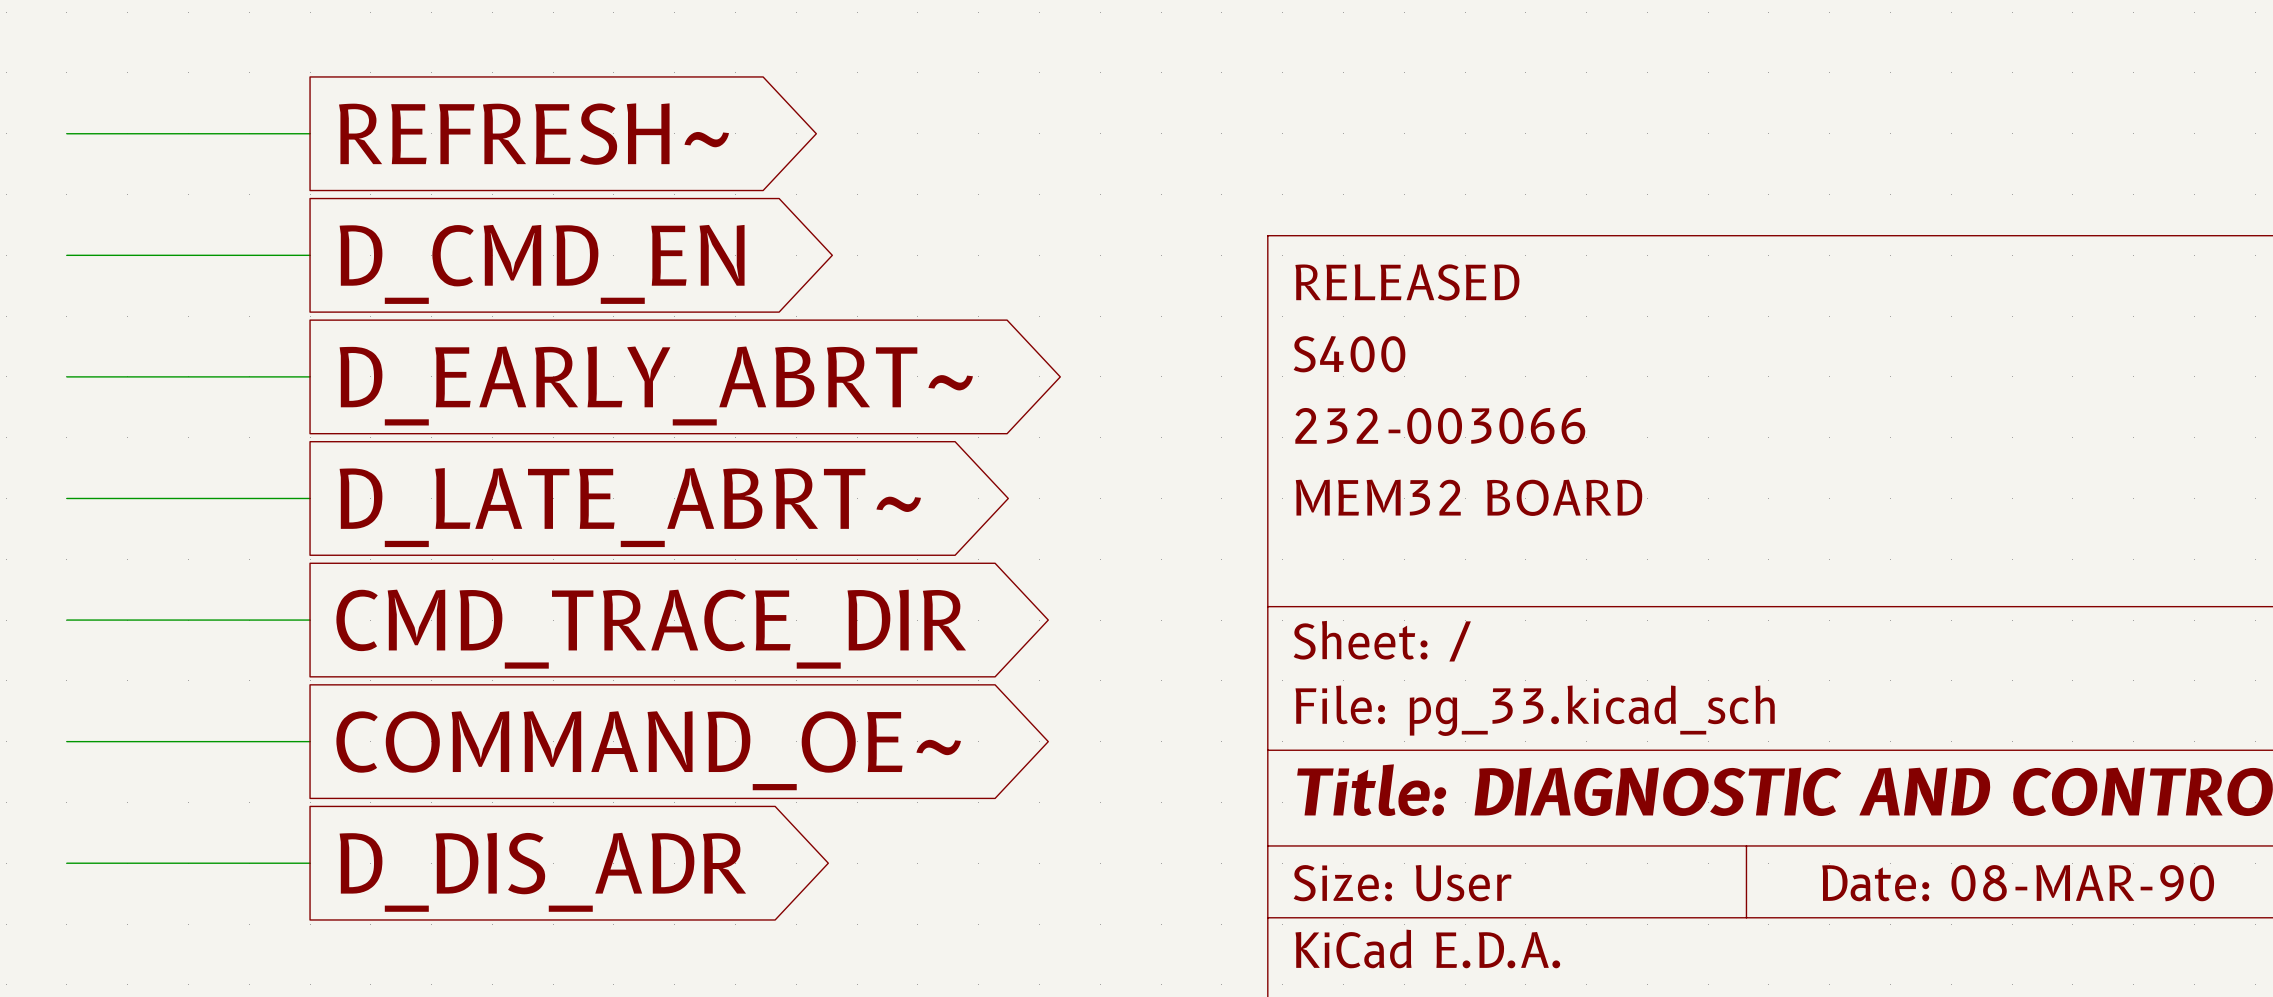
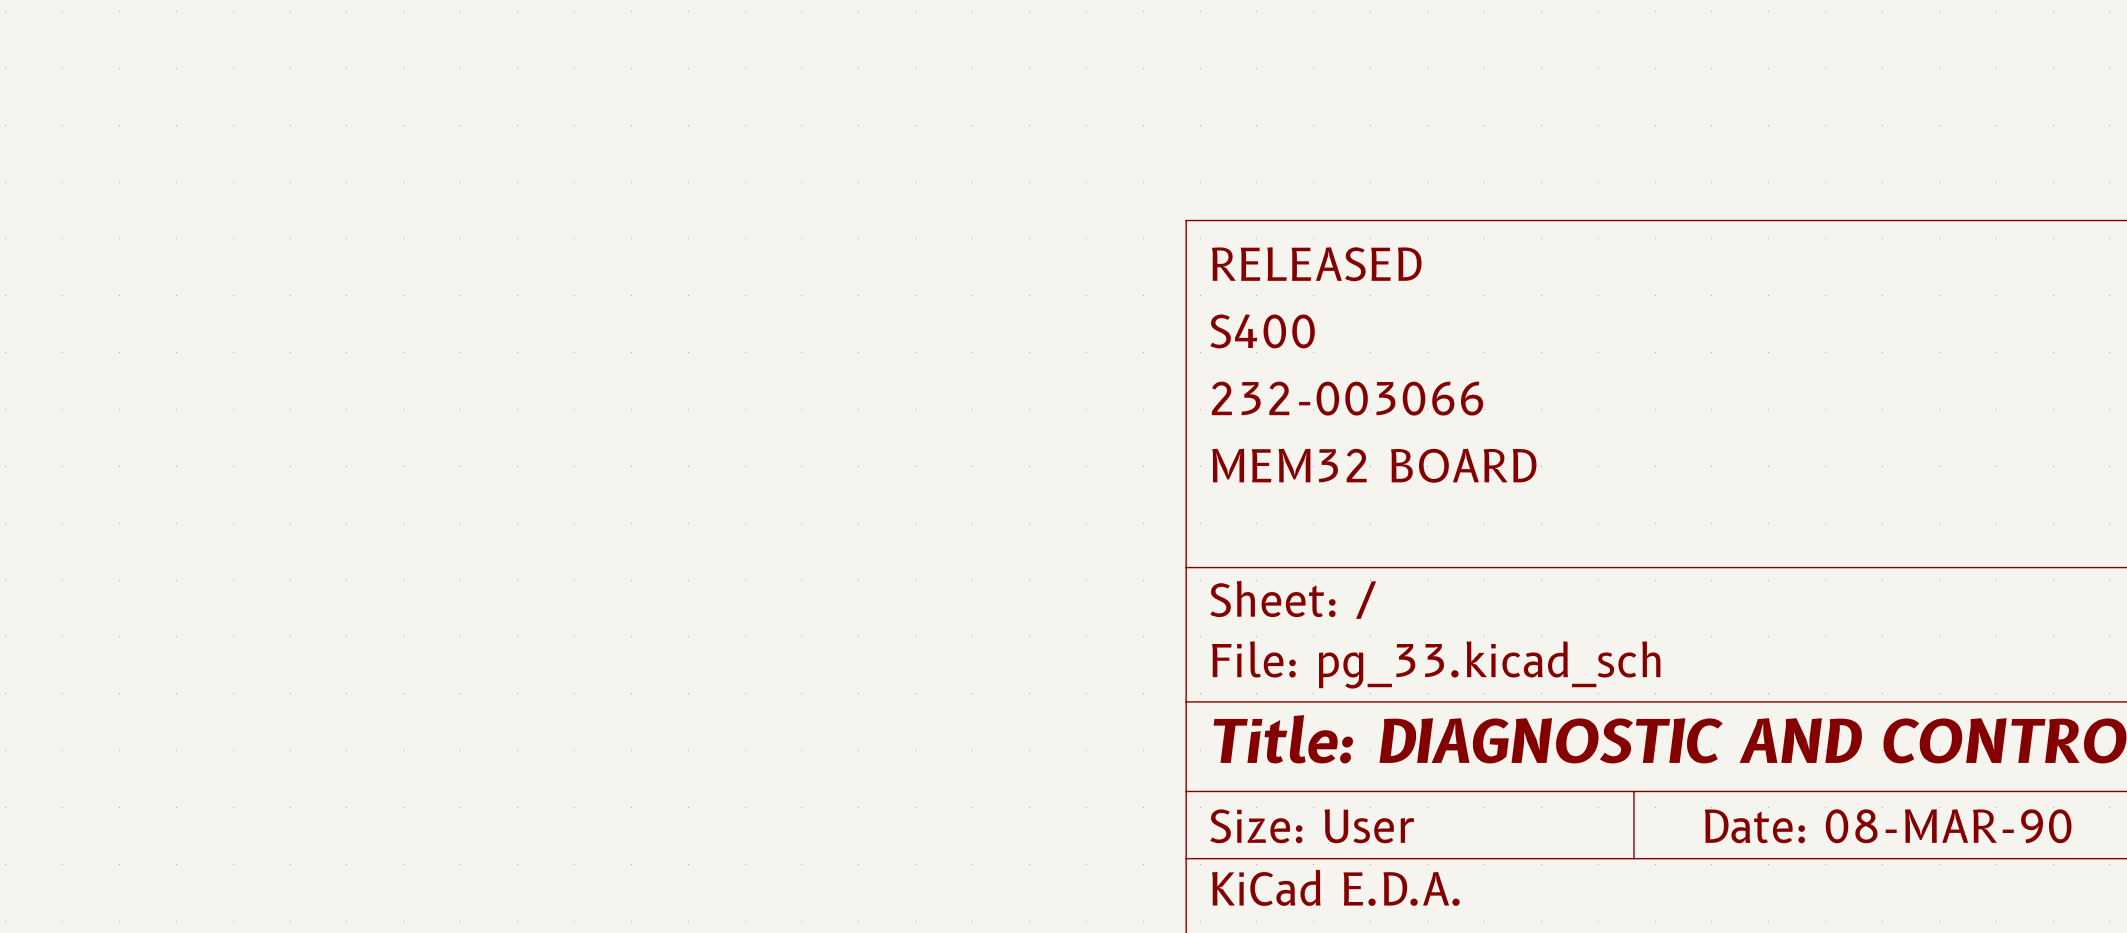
wire: (66, 133) (310, 133) -> none
global label: REFRESH~ (534, 134) -> none
wire: (66, 255) (310, 255) -> none
global label: D_CMD_EN (542, 264) -> none
wire: (66, 376) (310, 376) -> none
global label: D_EARLY_ABRT~ (656, 386) -> none
wire: (66, 498) (310, 498) -> none
global label: D_LATE_ABRT~ (630, 507) -> none
wire: (66, 620) (310, 620) -> none
global label: CMD_TRACE_DIR (651, 629) -> none
wire: (66, 741) (310, 741) -> none
global label: COMMAND_OE~ (648, 750) -> none
wire: (66, 863) (310, 863) -> none
global label: D_DIS_ADR (542, 872) -> none

